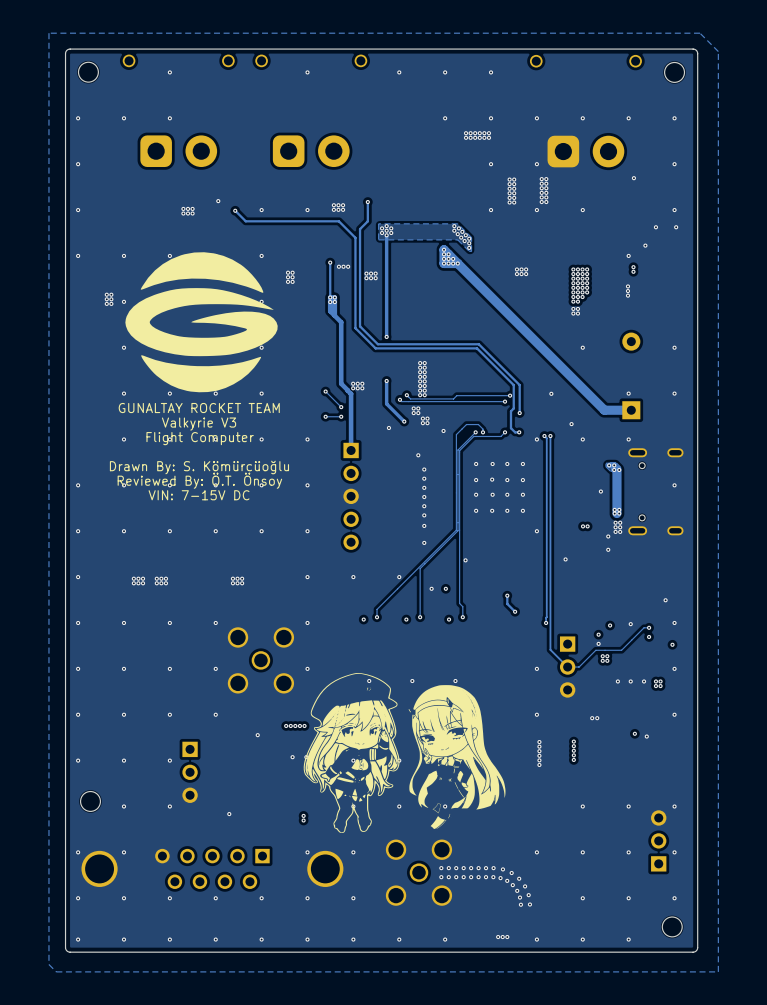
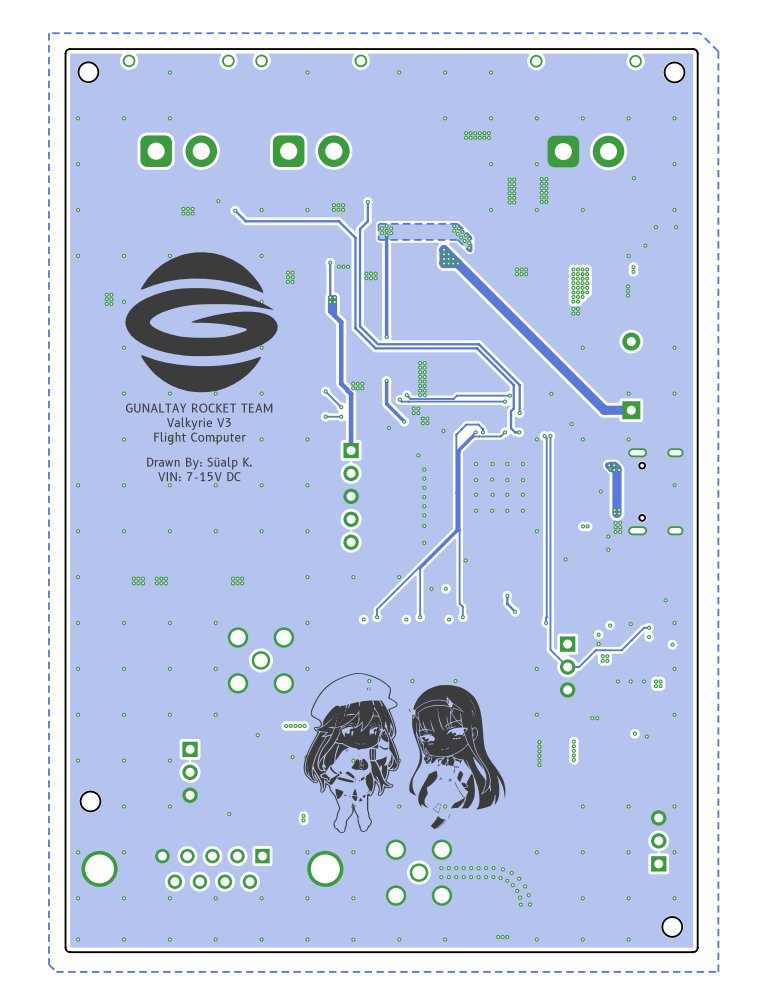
text: Drawn By: S. Kömürcüoğlu (199, 467) -> Drawn By: Süalp K. (199, 463)
text: Reviewed By: Ö.T. Önsoy (199, 480) -> VIN: 7-15V DC (199, 476)
text: VIN: 7-15V DC (199, 495) -> none

